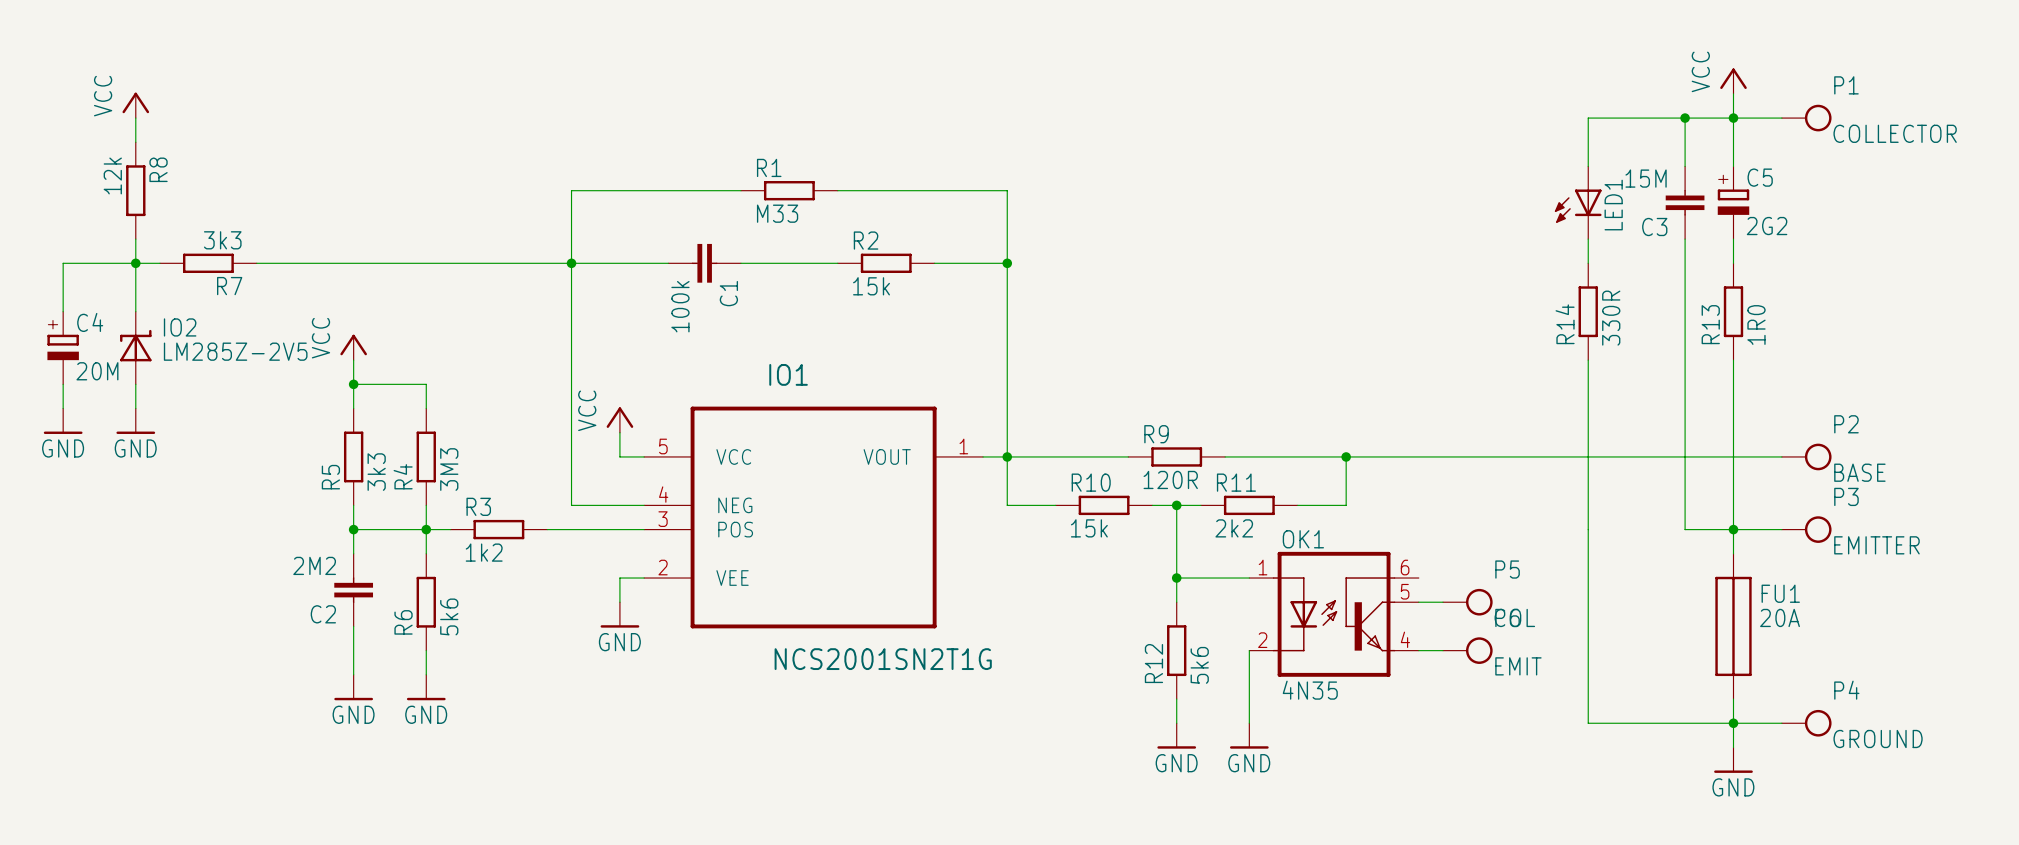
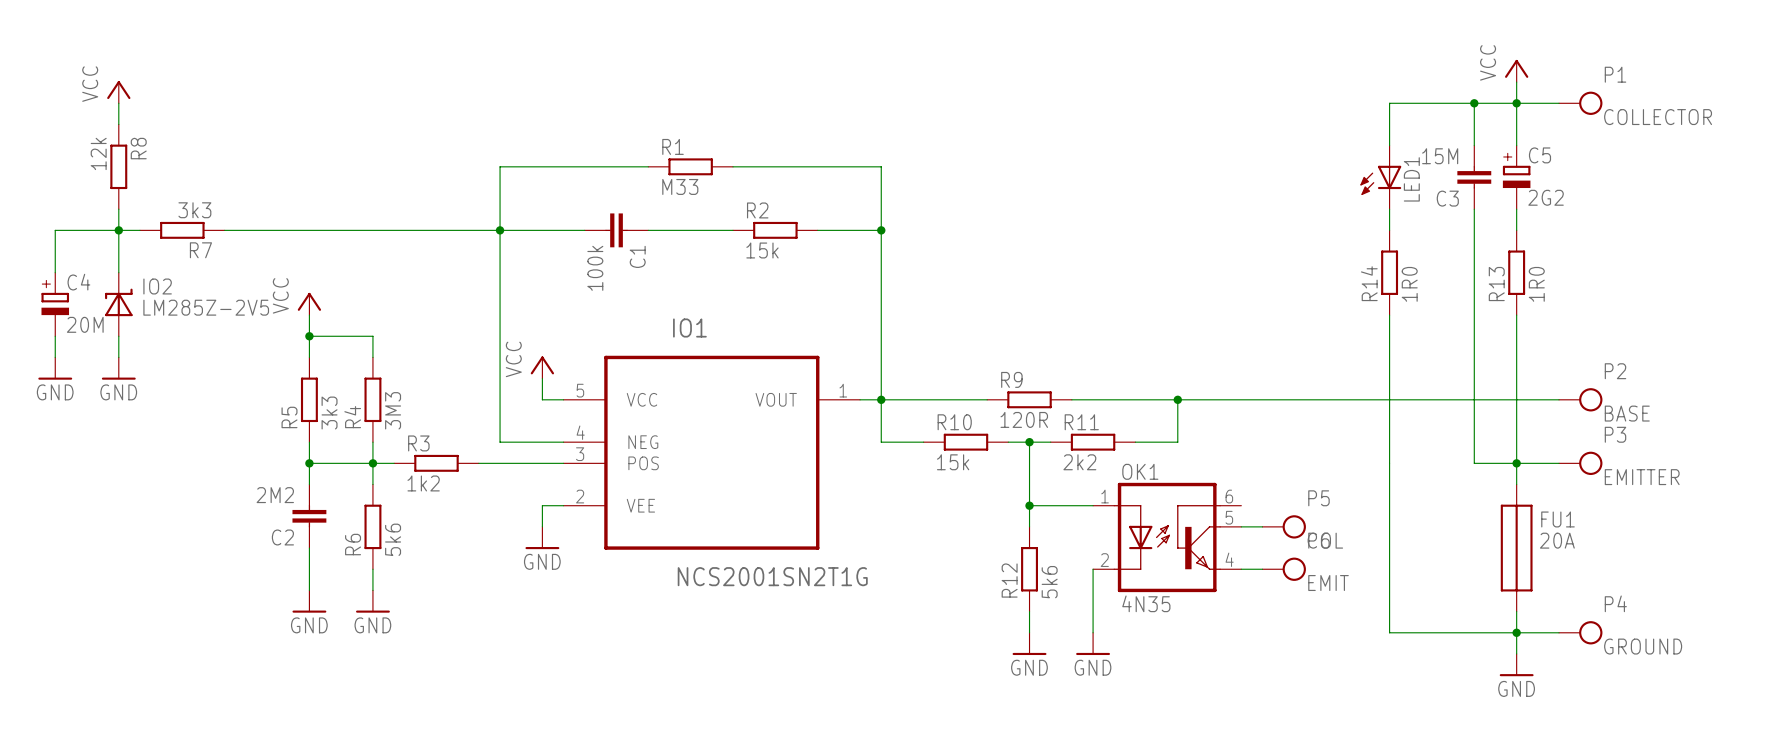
R14 value: 330R (1611, 318) -> 1R0 (1409, 284)

